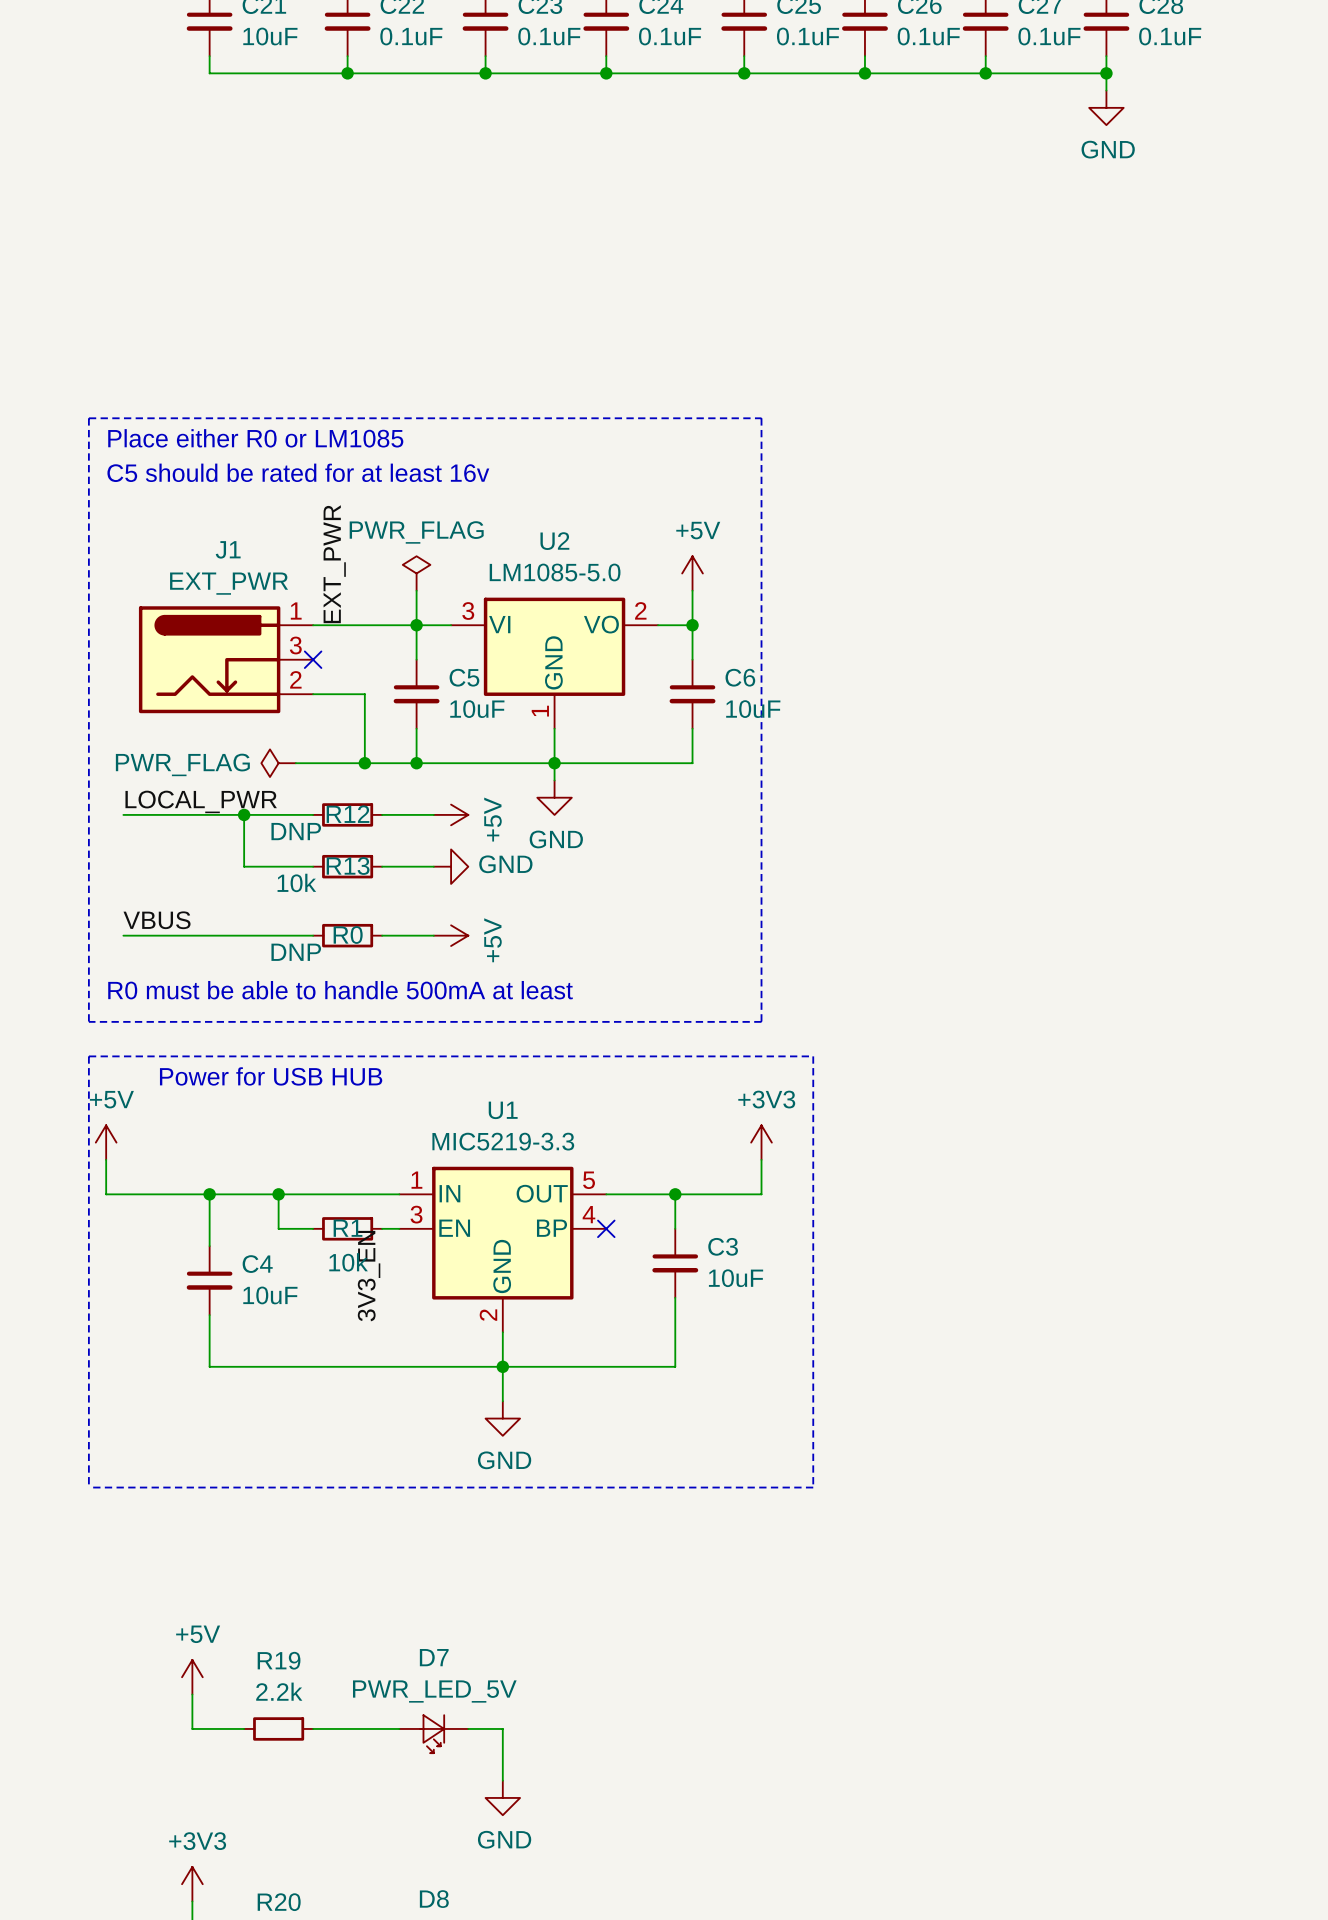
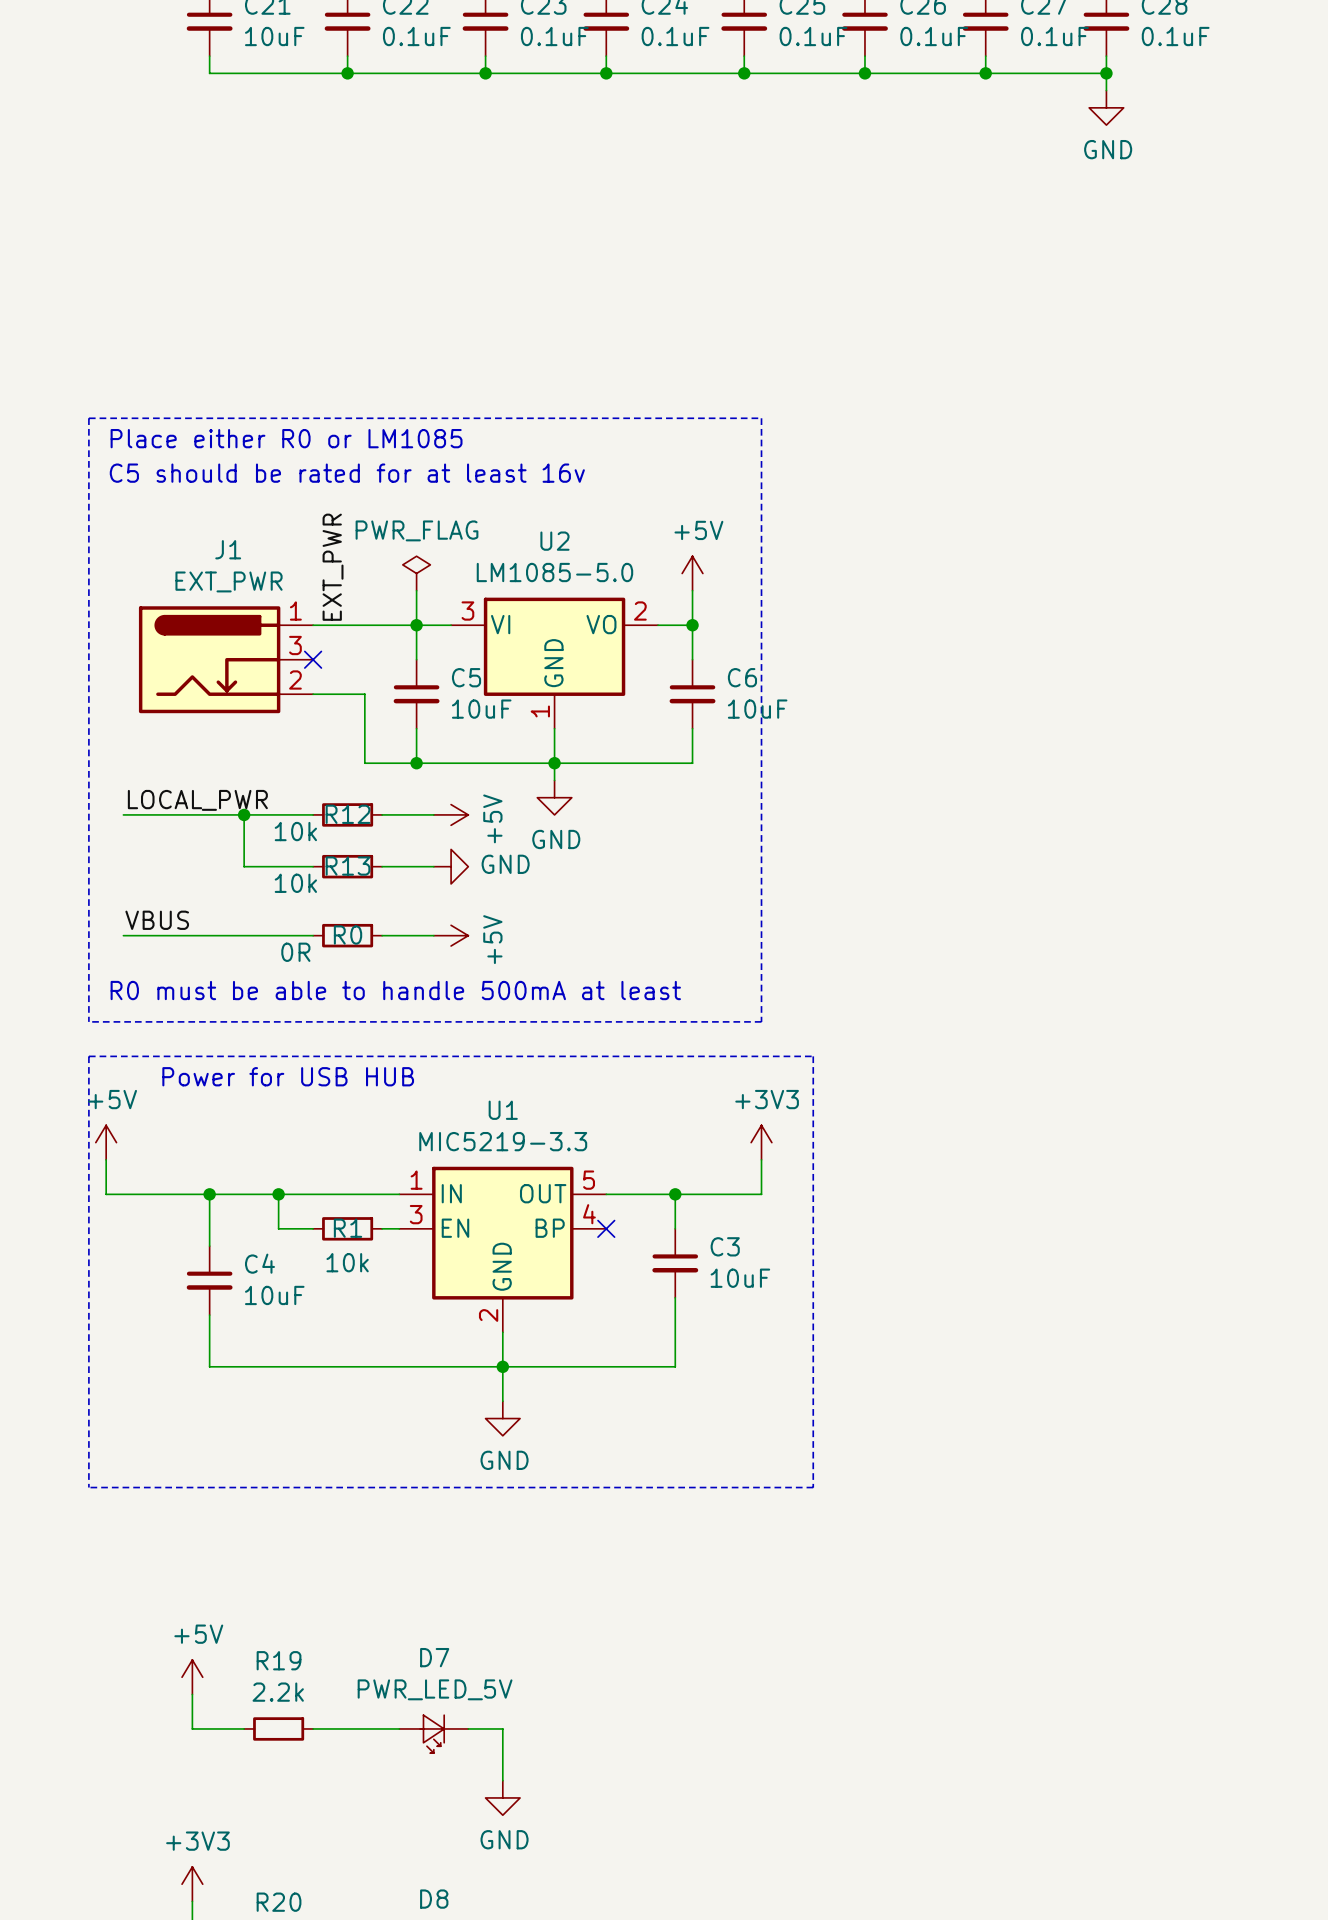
power symbol: PWR_FLAG (278, 763) -> none
wire: (295, 763) (364, 763) -> none
junction: (364, 763) -> none
R12 value: DNP (296, 831) -> 10k (295, 831)
R0 value: DNP (296, 952) -> 0R (295, 952)
label: 3V3_EN (369, 1276) -> none

